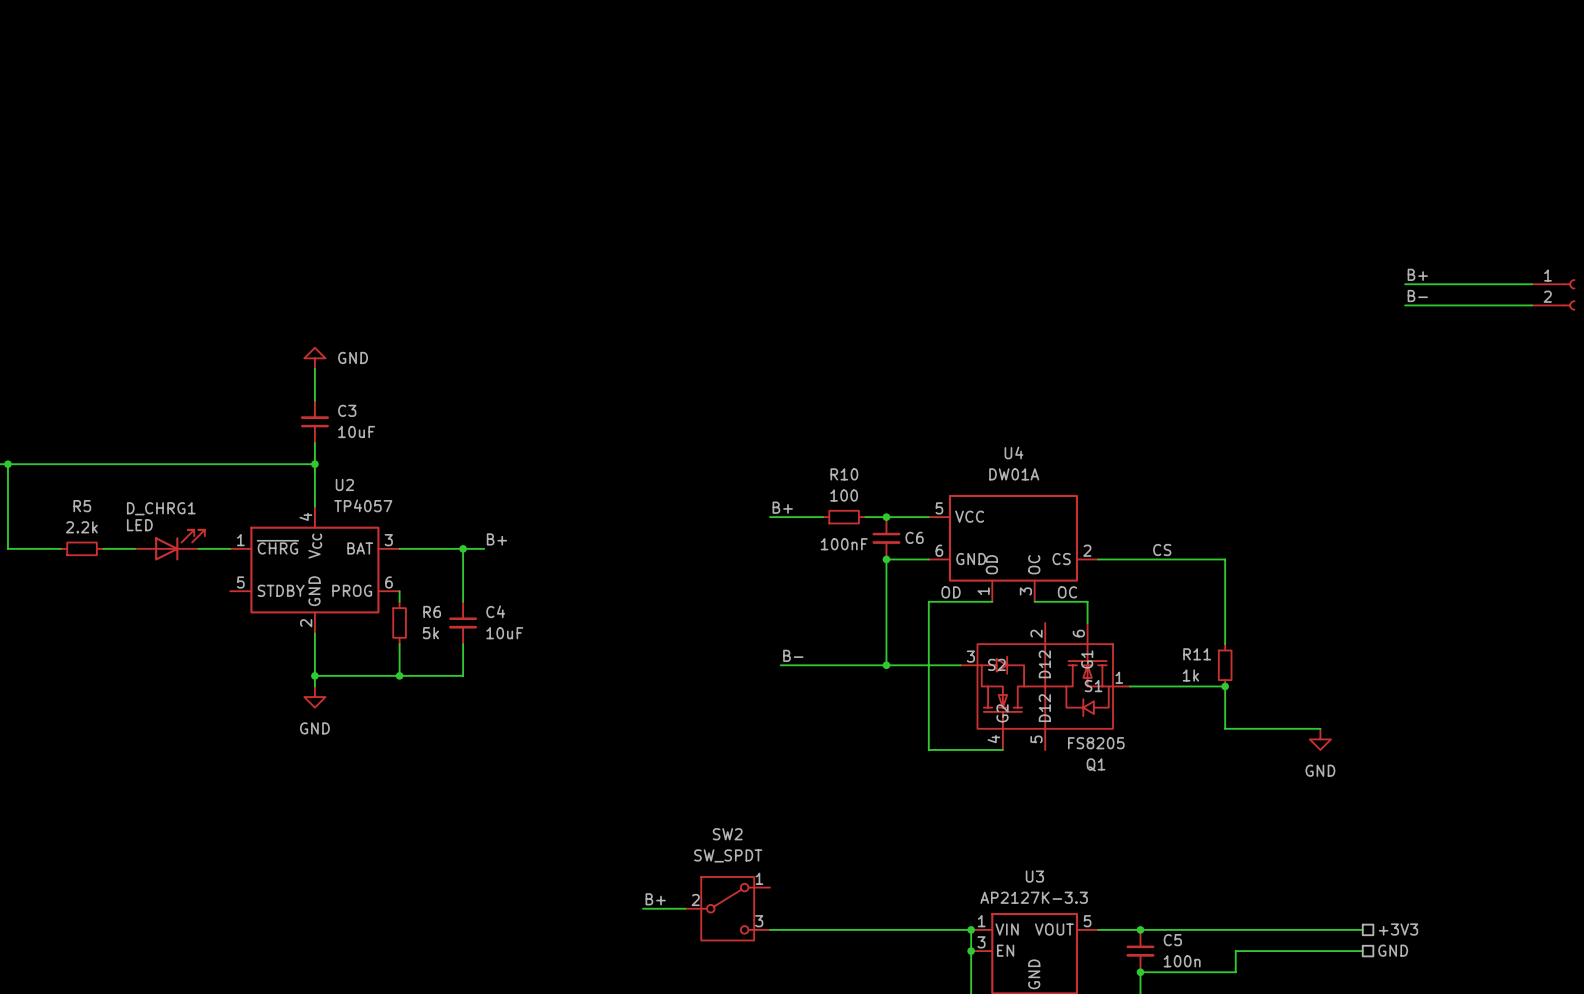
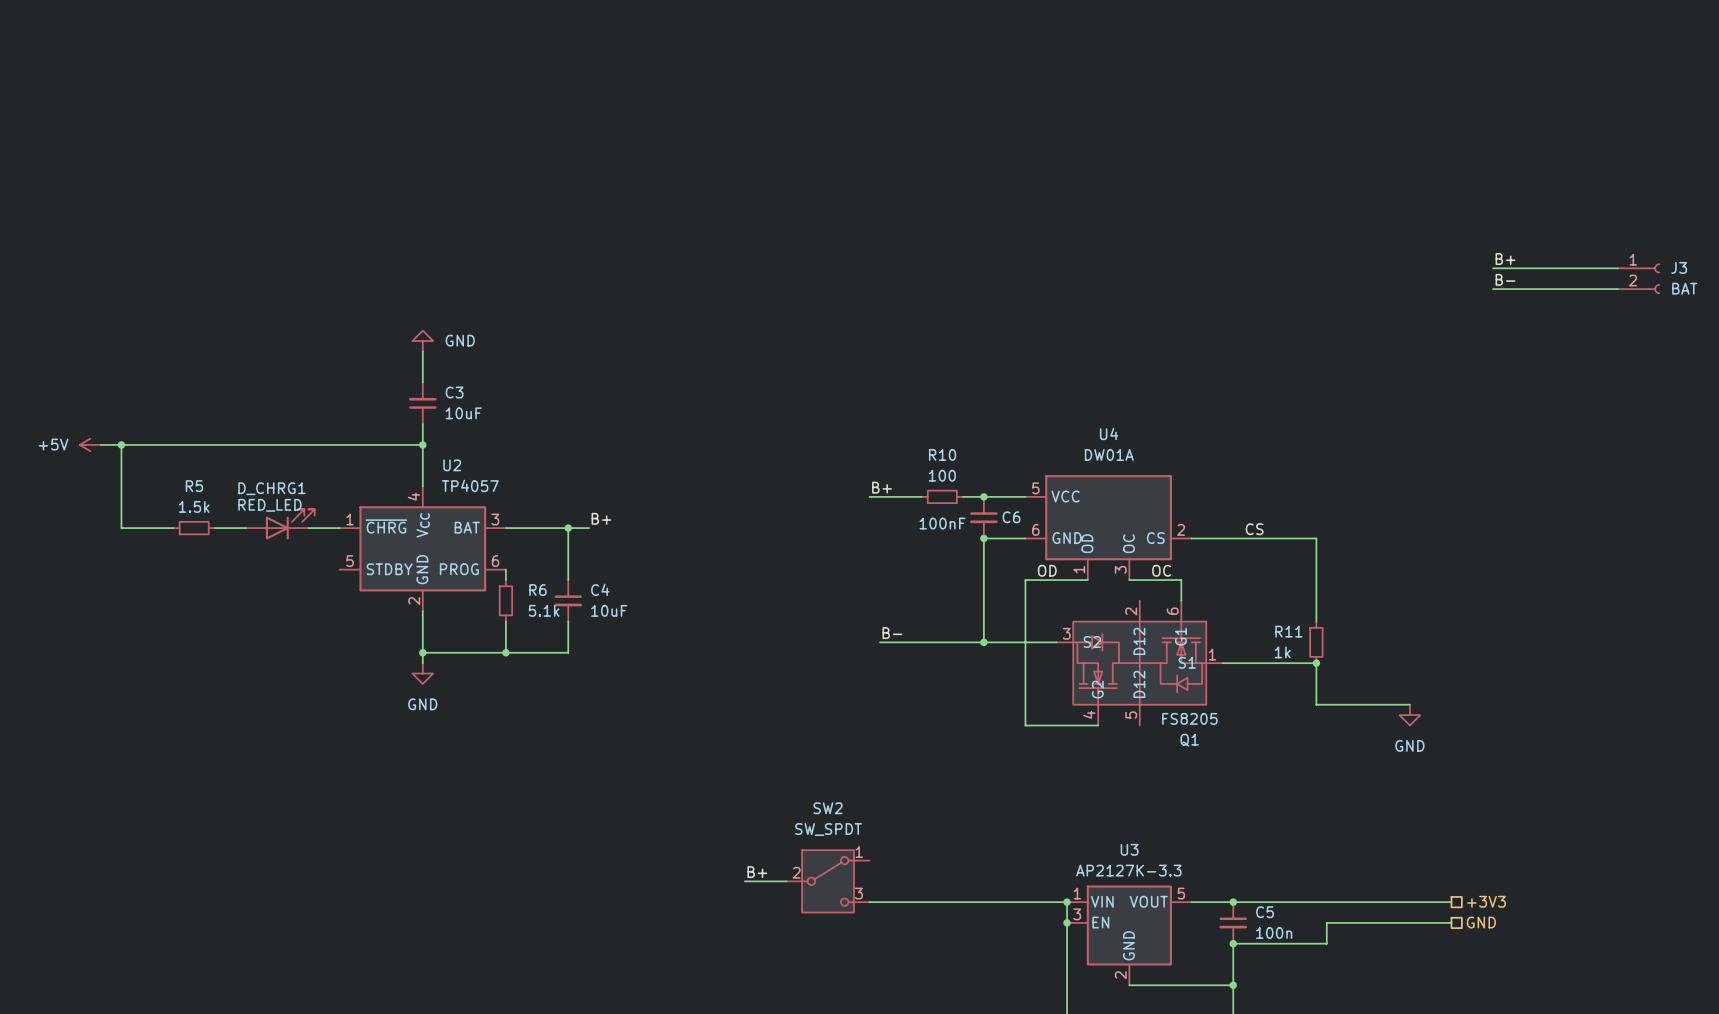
D_CHRG1 value: LED (139, 525) -> RED_LED (269, 505)
R5 value: 2.2k (81, 527) -> 1.5k (194, 506)
R6 value: 5k (430, 633) -> 5.1k (544, 610)

